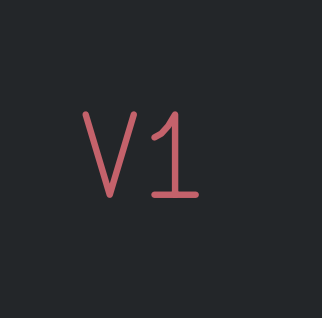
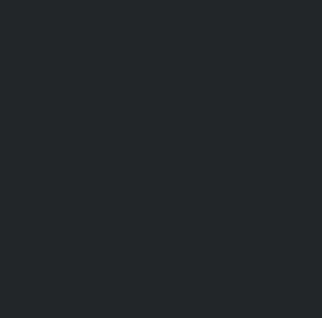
text: V1 (140, 154) -> none

